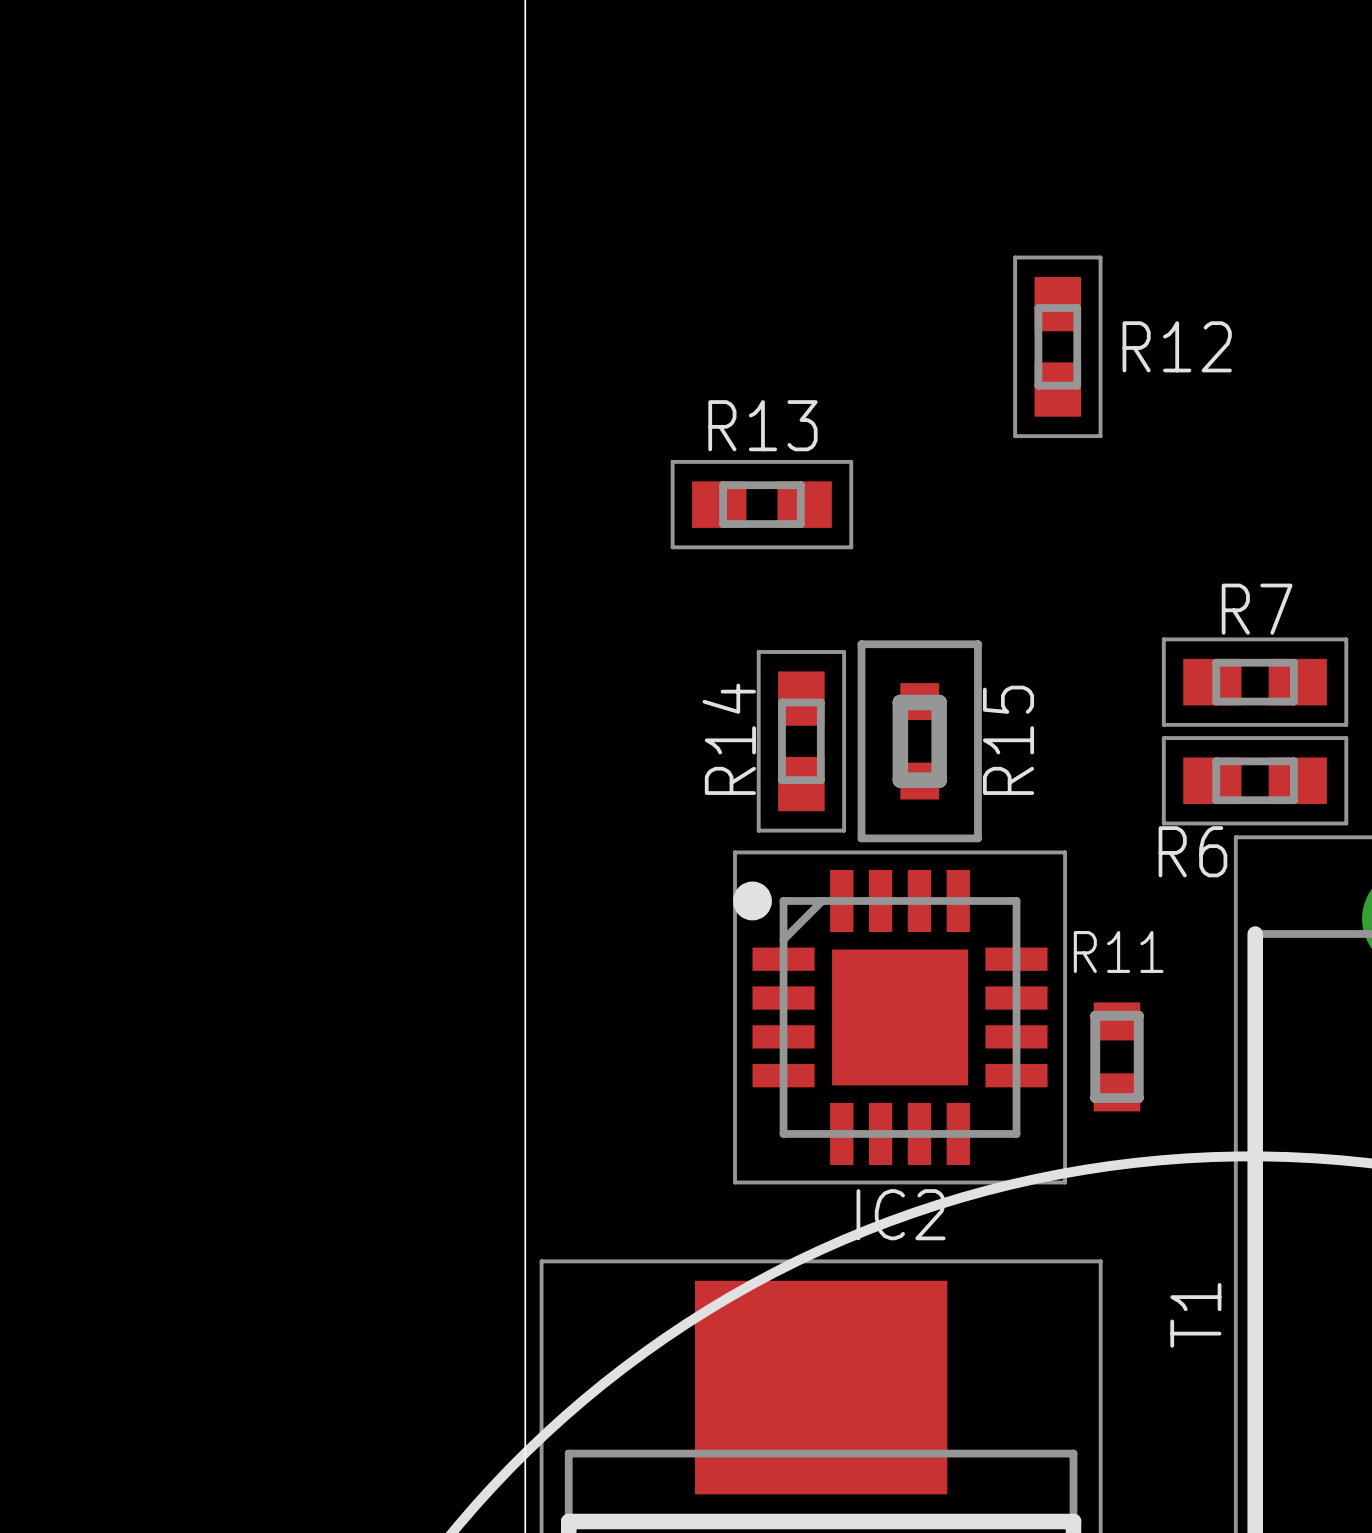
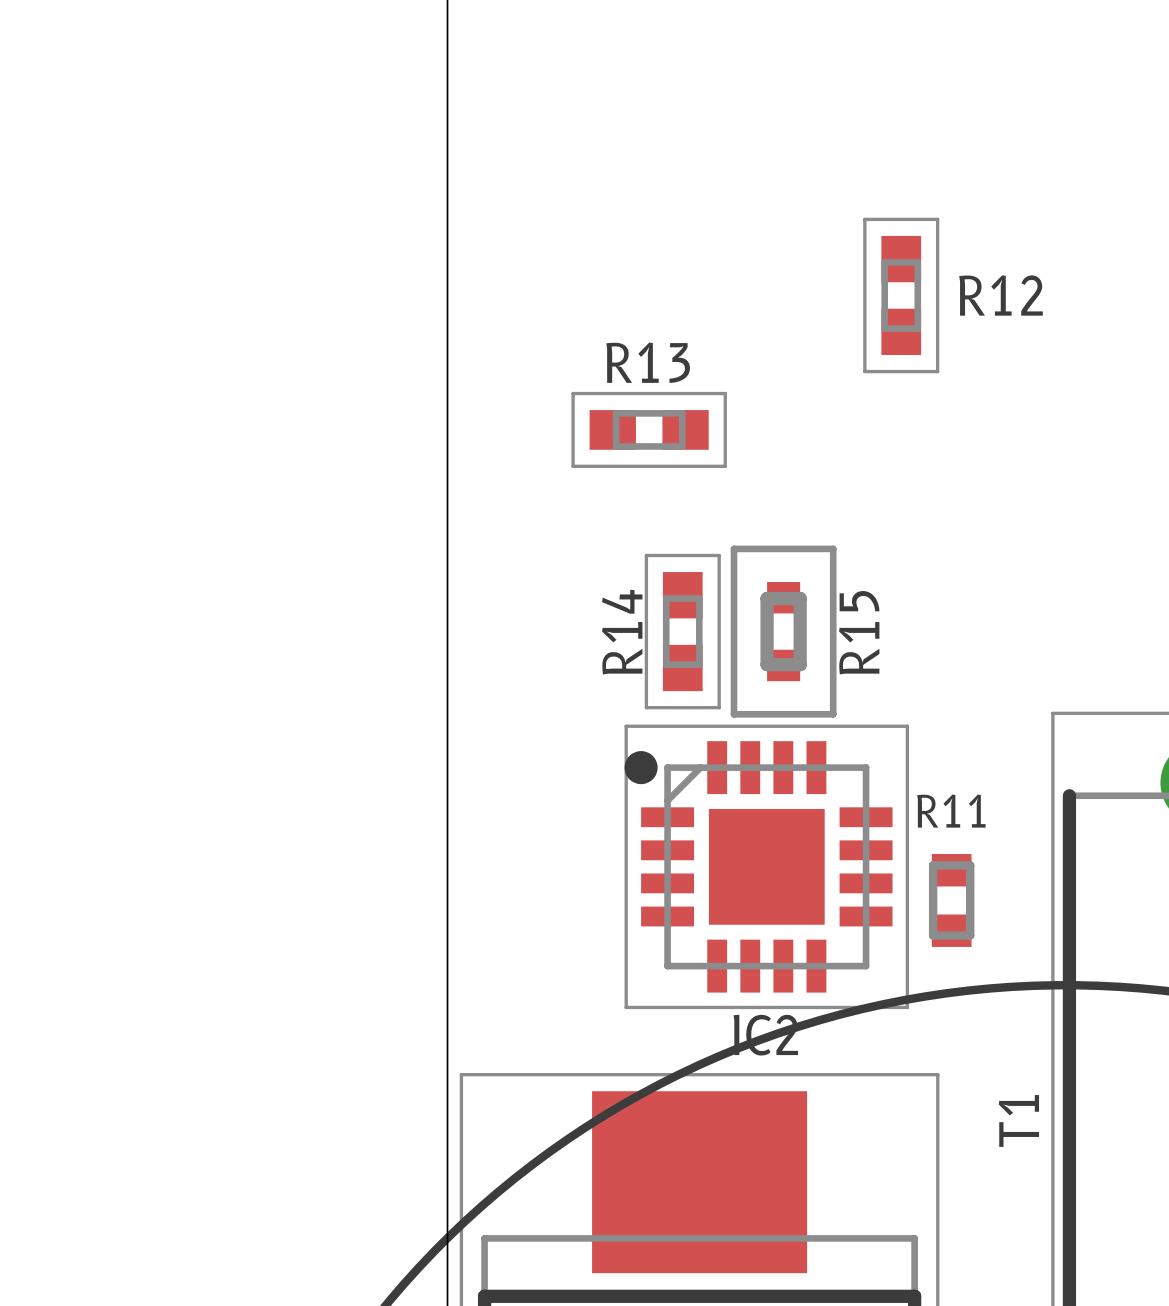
R7: (1255, 682) -> none
R6: (1255, 780) -> none

